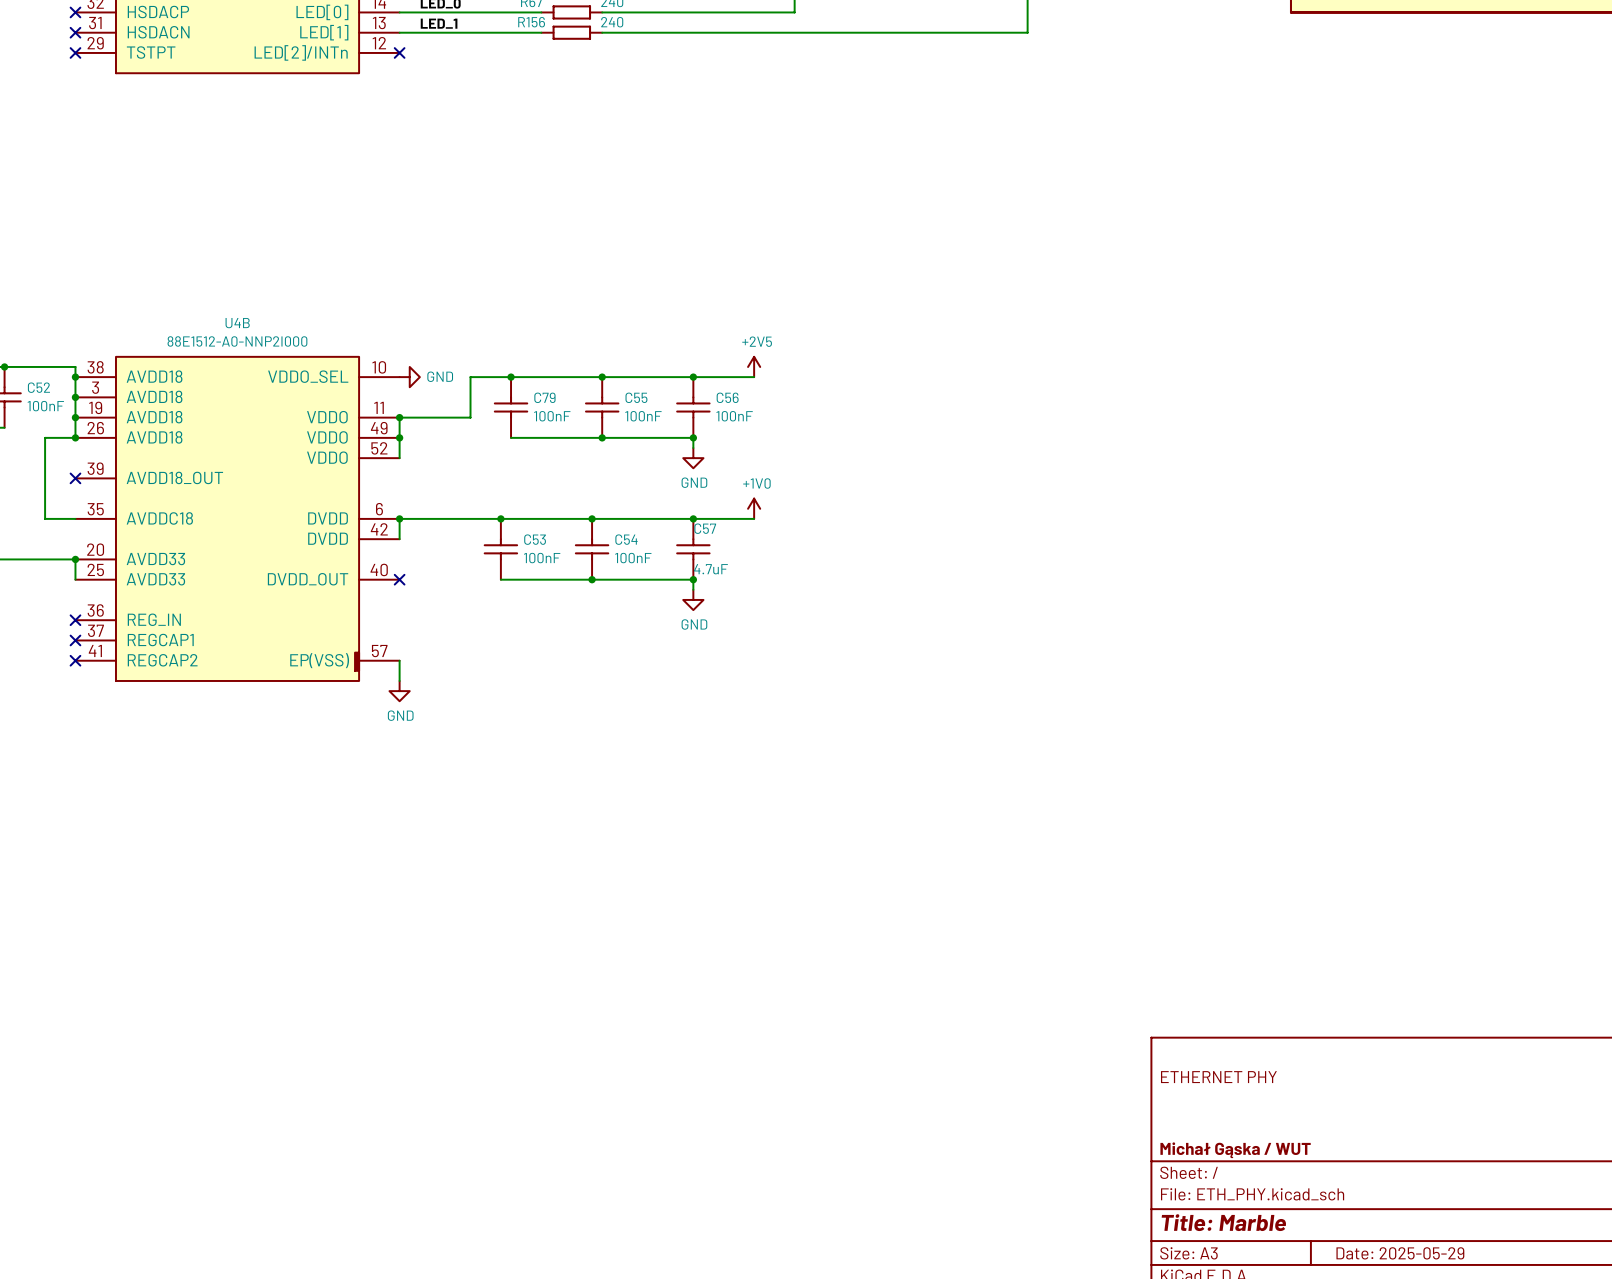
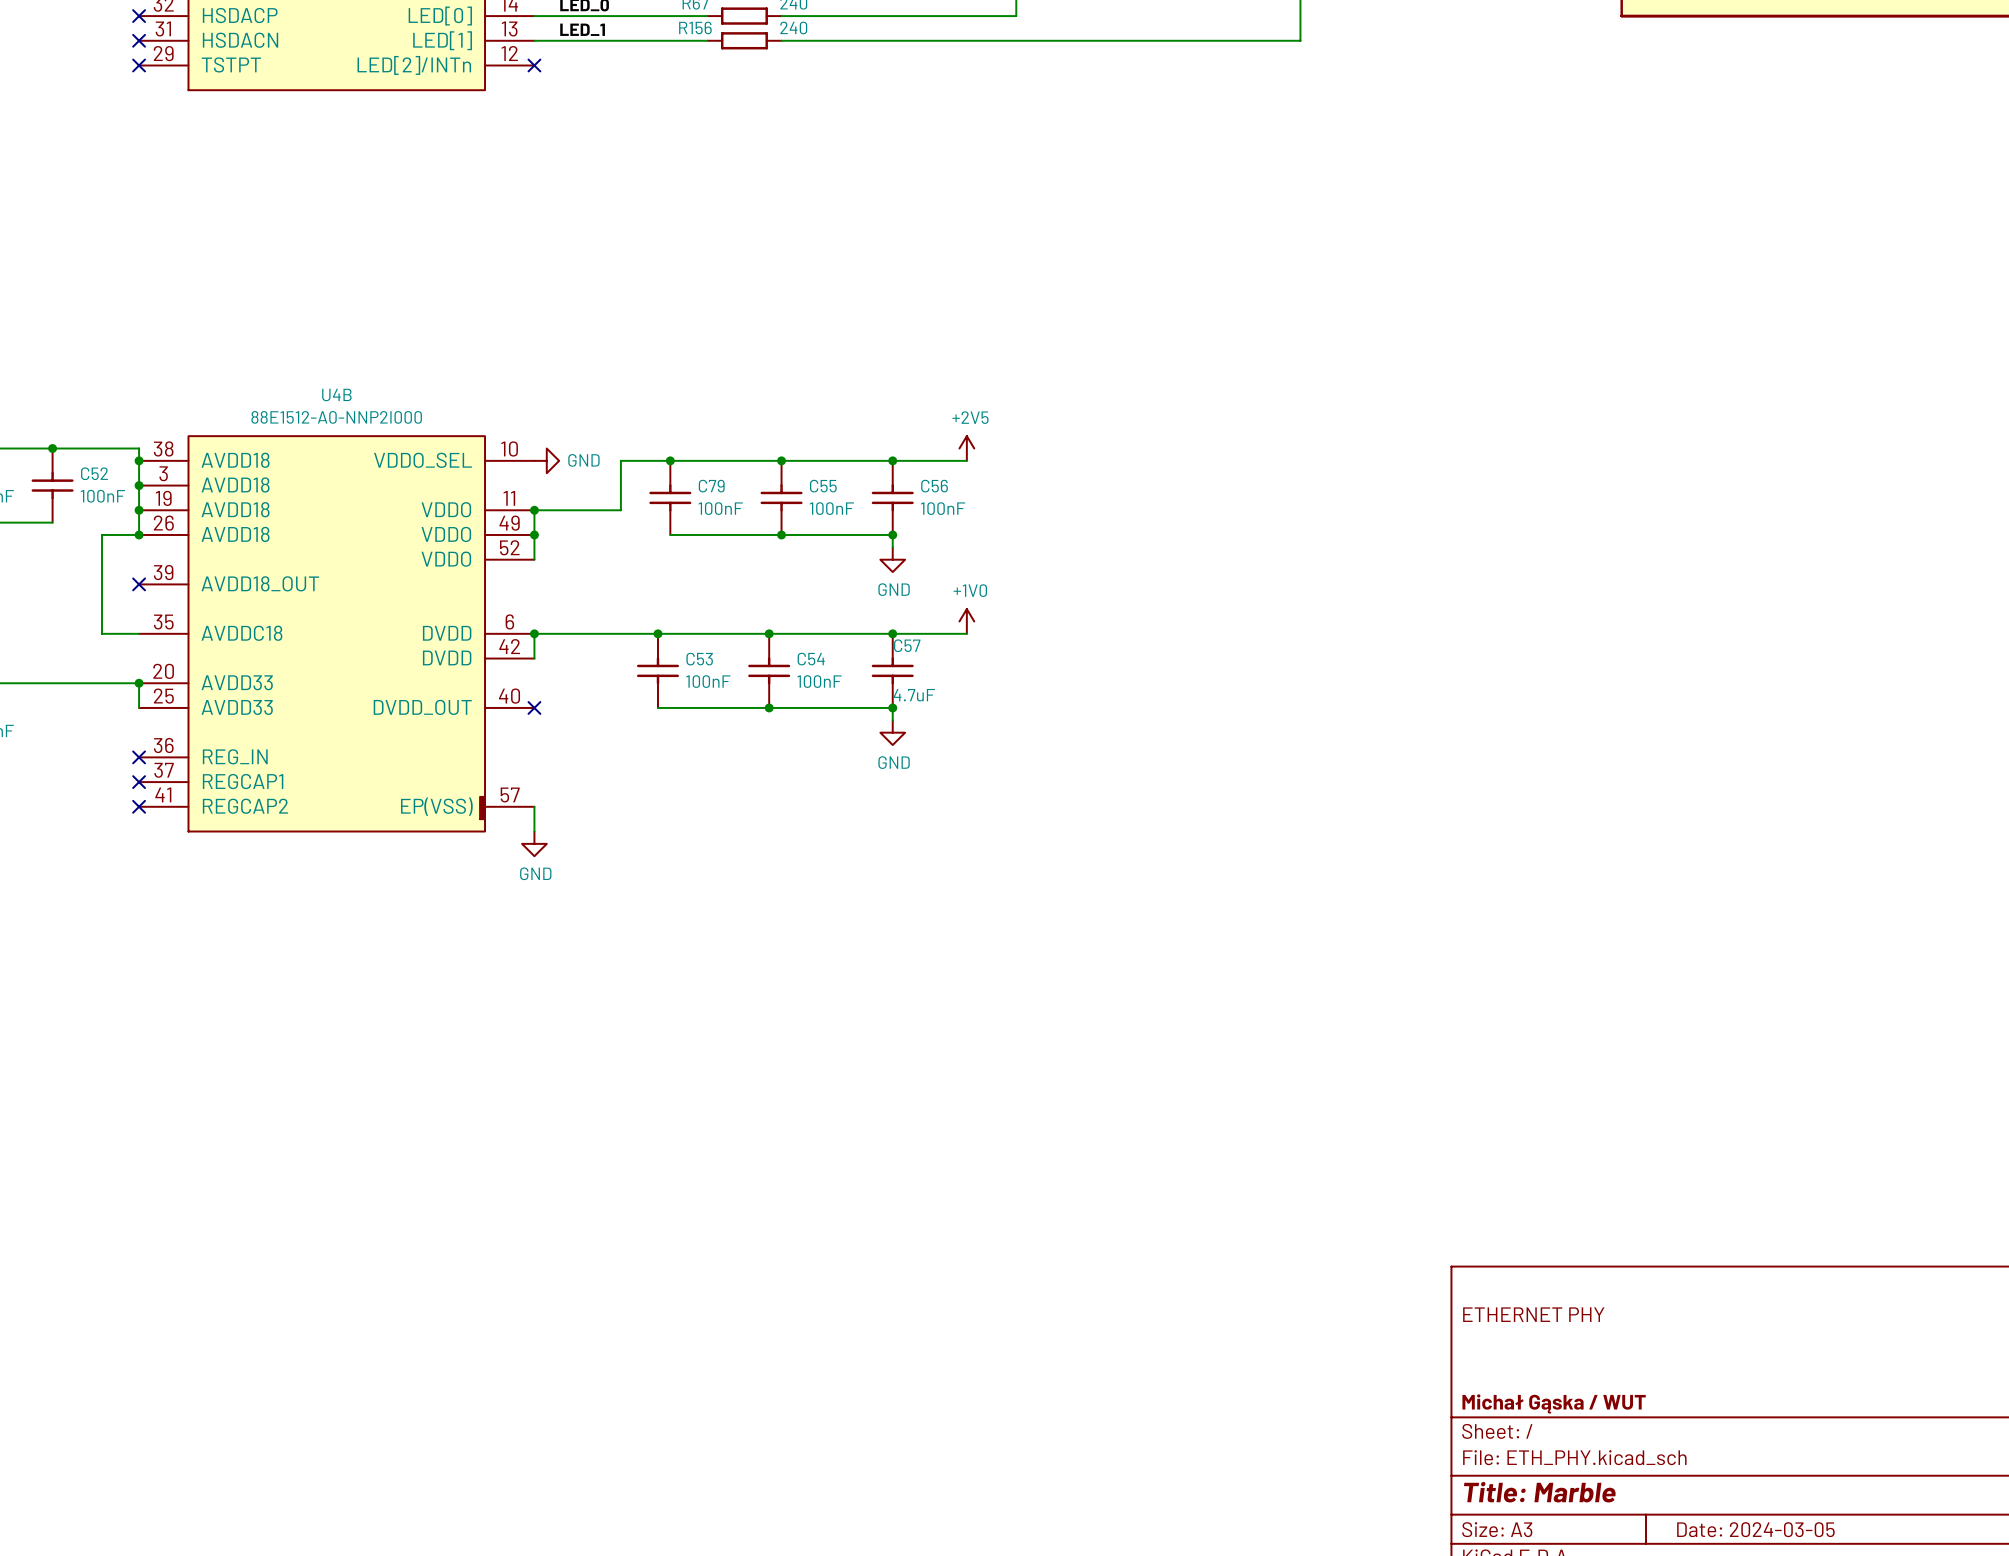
title block: Date: 2025-05-29 (1400, 1253) -> Date: 2024-03-05 (1755, 1529)

